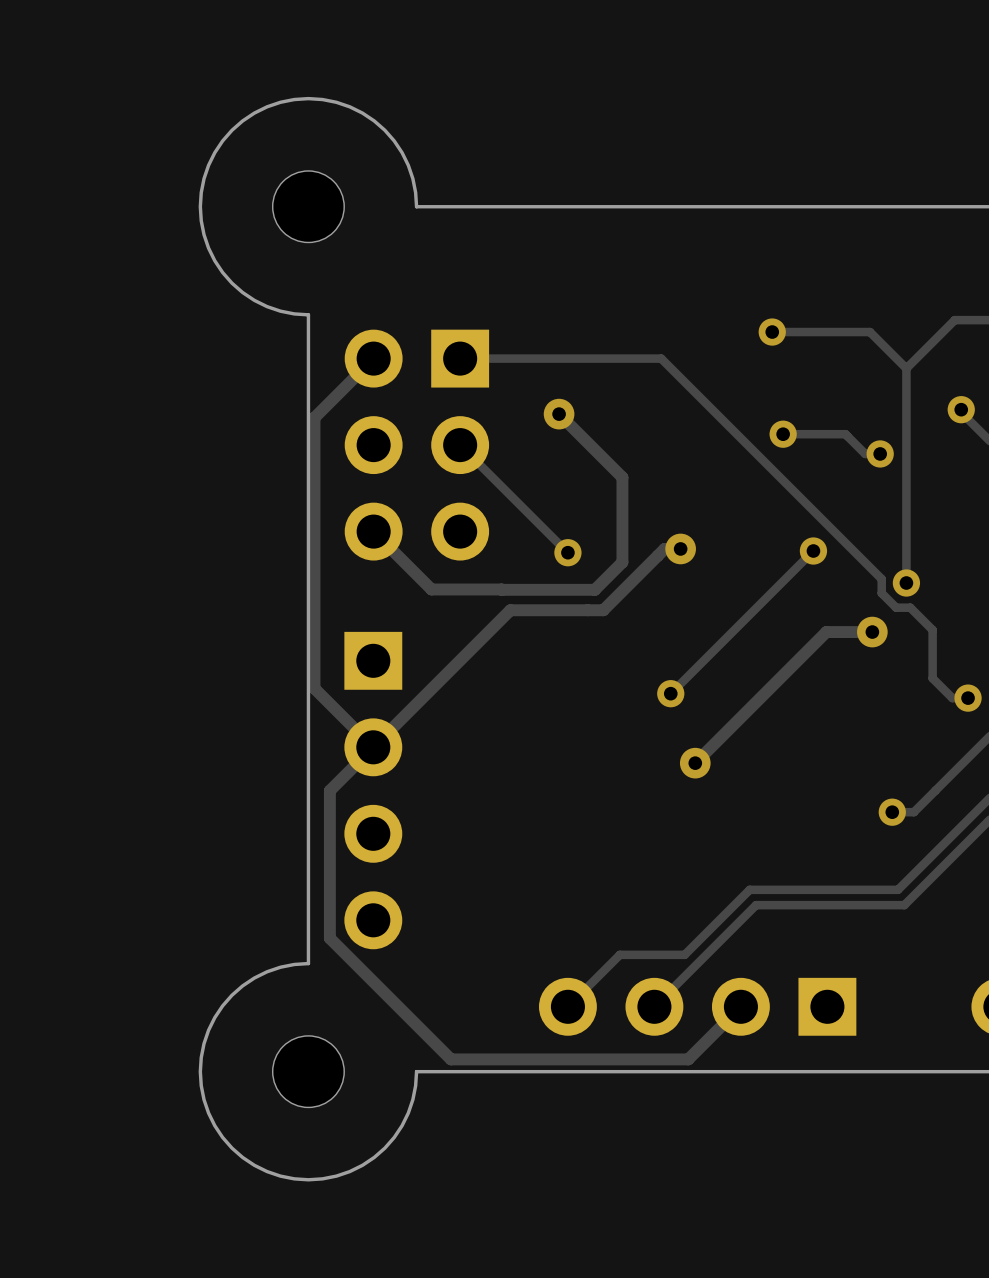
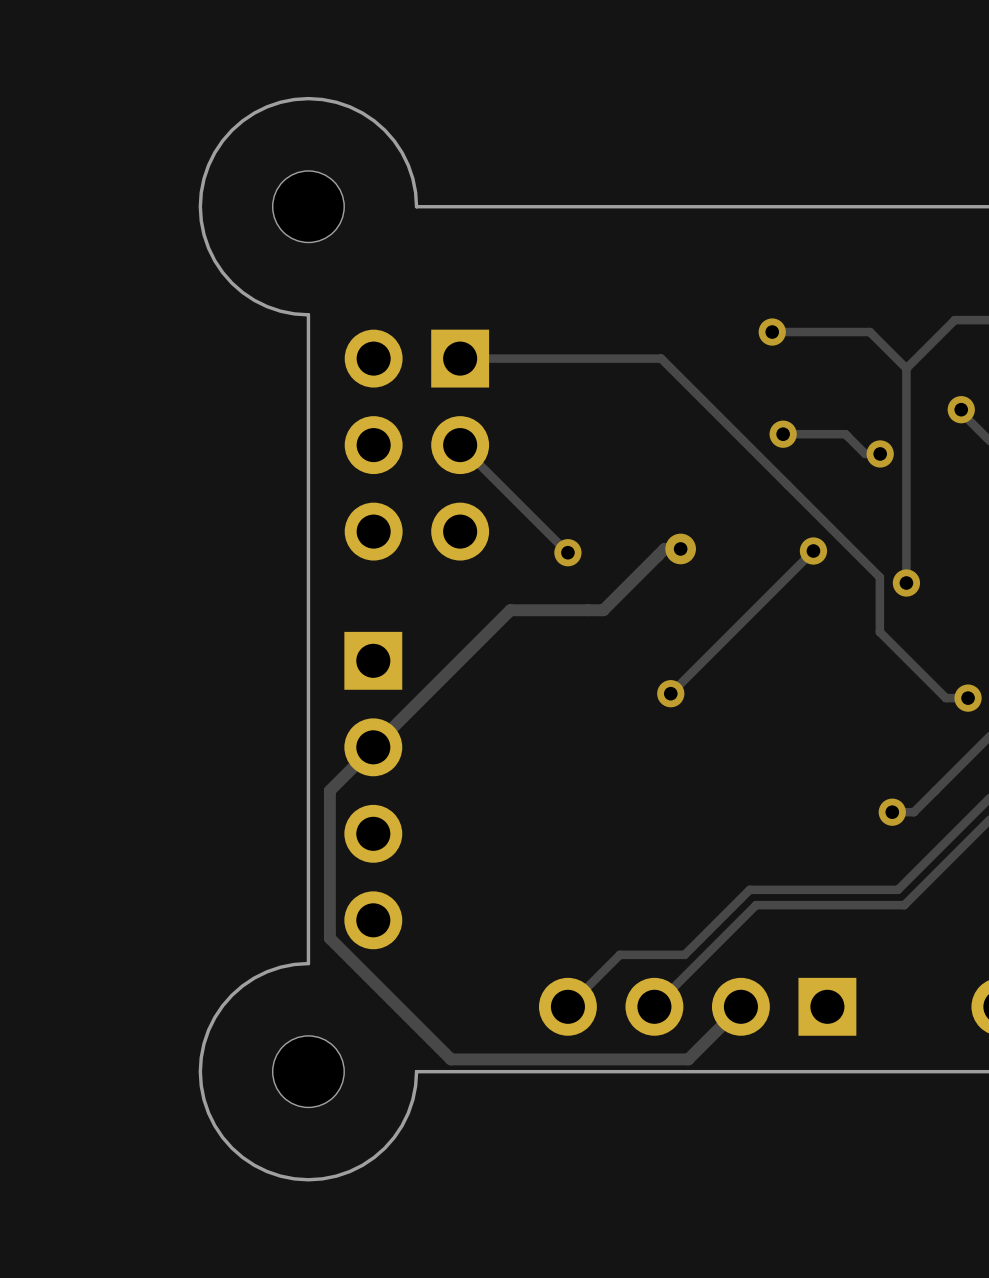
track: (373, 358) (314, 417) (314, 688) (373, 747) -> none
track: (559, 414) (622, 477) (622, 562) (594, 589) (501, 589) -> none
via: (559, 414) -> none
track: (373, 531) (431, 589) (501, 589) -> none
track: (879, 577) (881, 579) (881, 593) (896, 607) (910, 607) (932, 630) (932, 678) (952, 698) -> (879, 577) (879, 632) (945, 698) (952, 698)
track: (872, 632) (826, 632) (695, 763) -> none
via: (872, 632) -> none
via: (695, 763) -> none

